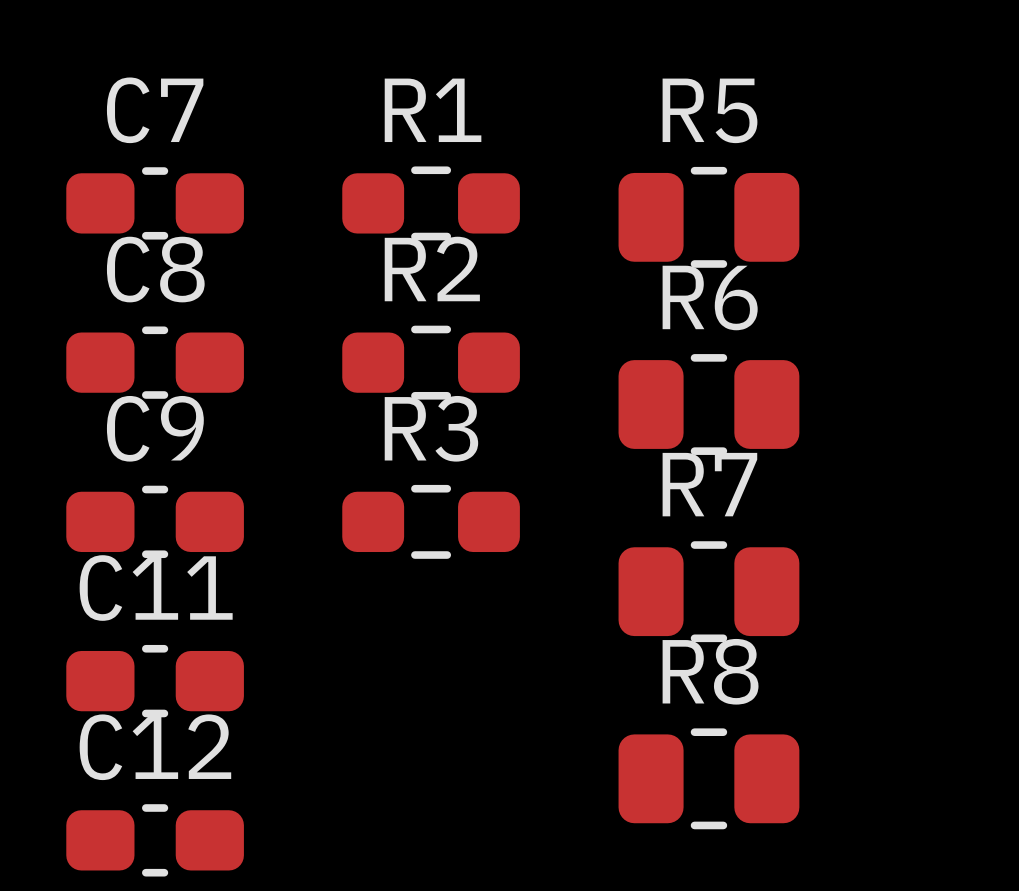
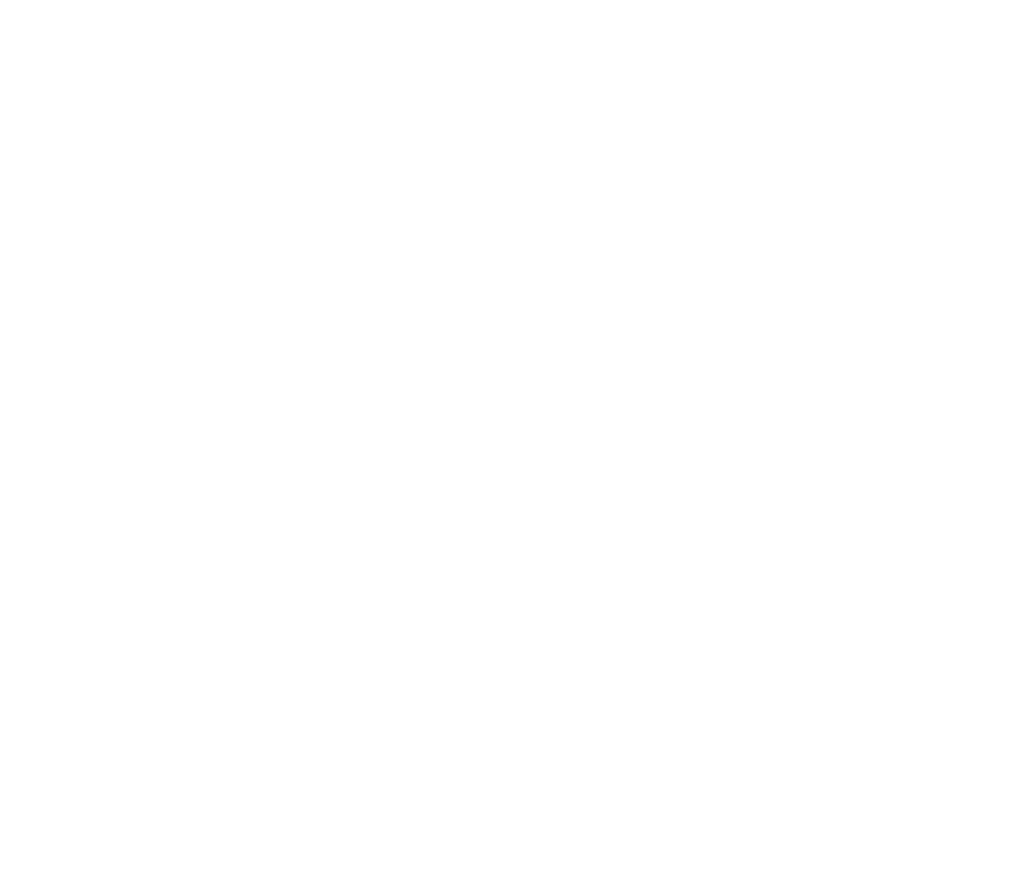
C7: (155, 203) -> none
R1: (431, 203) -> none
R5: (708, 217) -> none
C8: (155, 362) -> none
R2: (431, 362) -> none
R6: (708, 404) -> none
C9: (155, 521) -> none
R3: (431, 521) -> none
R7: (708, 591) -> none
C11: (155, 681) -> none
R8: (708, 778) -> none
C12: (155, 840) -> none

